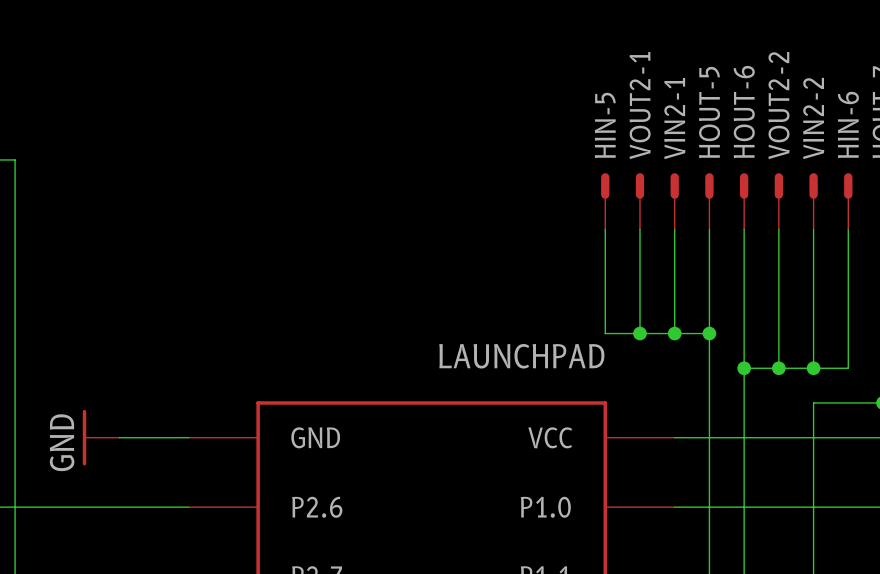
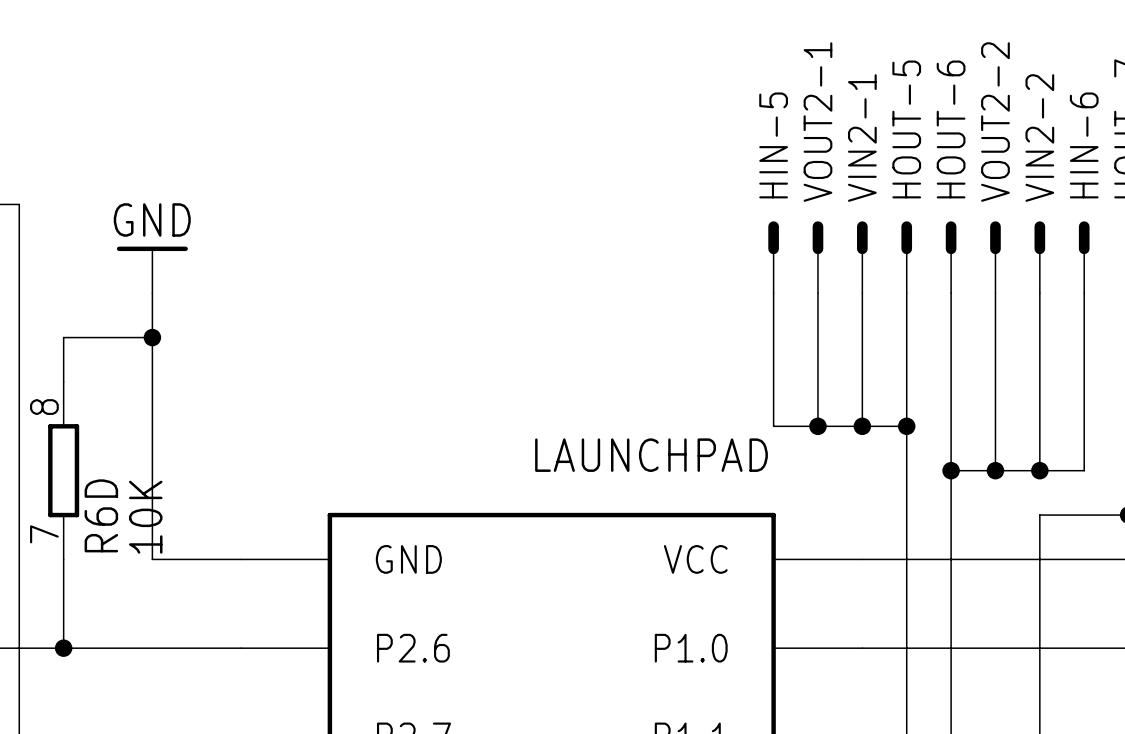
wire: none -> (152, 293) (152, 559)
wire: none -> (152, 337) (63, 337) (63, 381)
junction: none -> (152, 337)
R6D: none -> 10K (63, 470)
wire: none -> (63, 559) (63, 648)
power symbol rotation: 0° (84, 437) -> 90° clockwise (152, 248)
power symbol position: GND (101, 437) -> GND (152, 269)
junction: none -> (63, 648)

